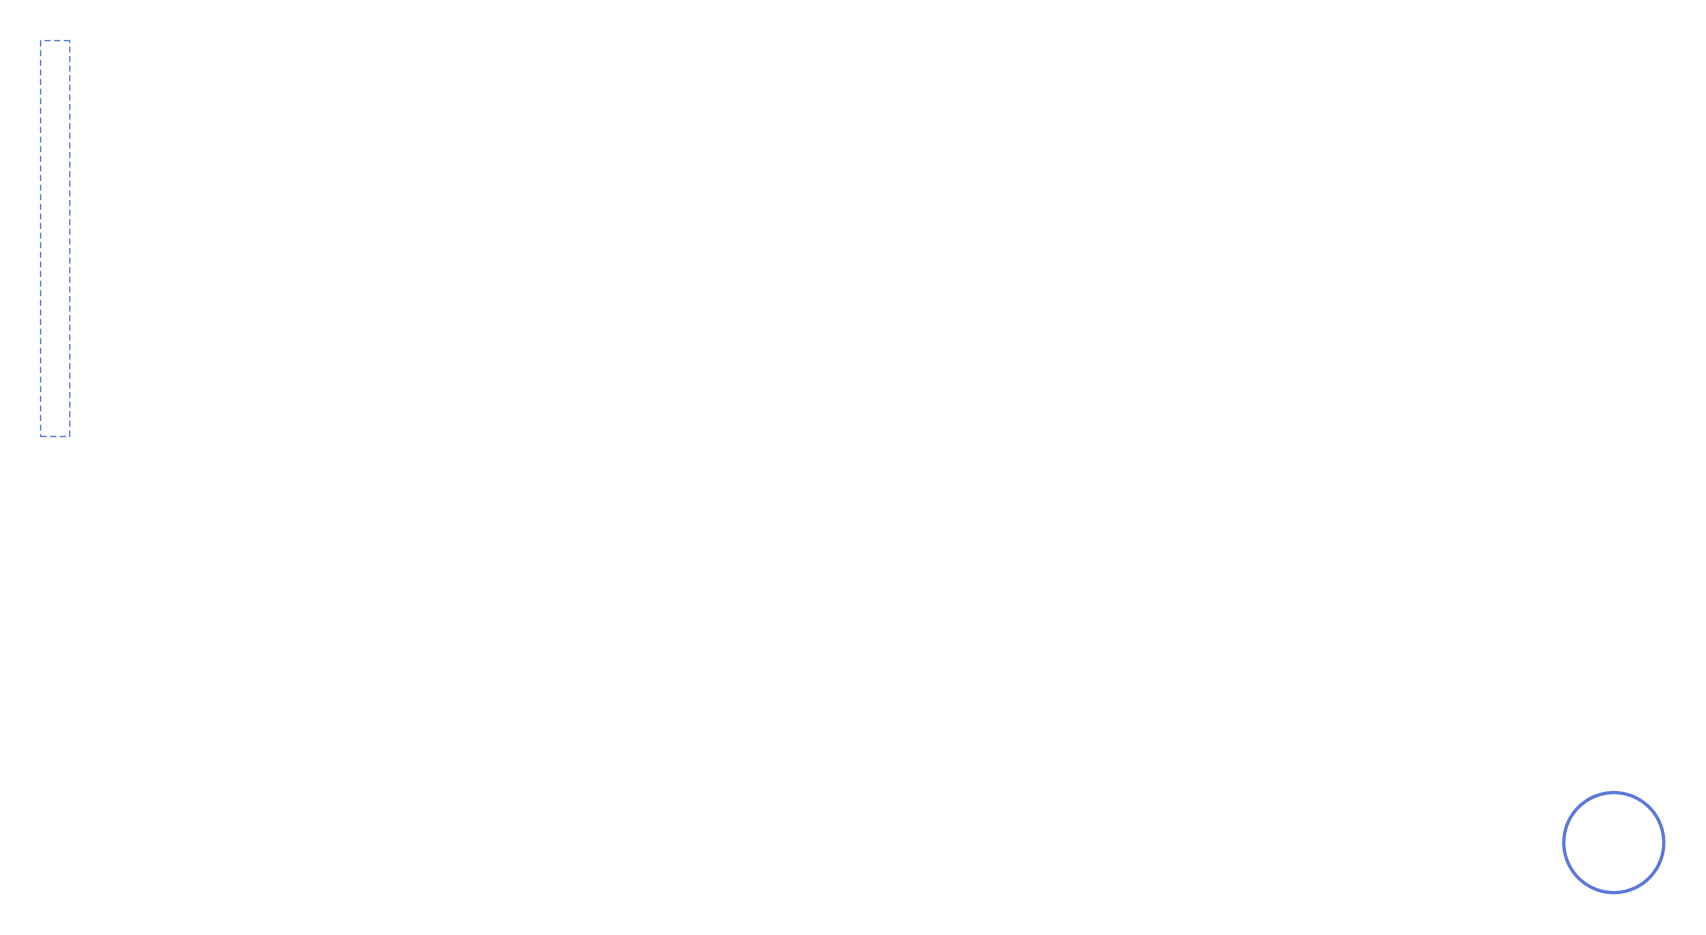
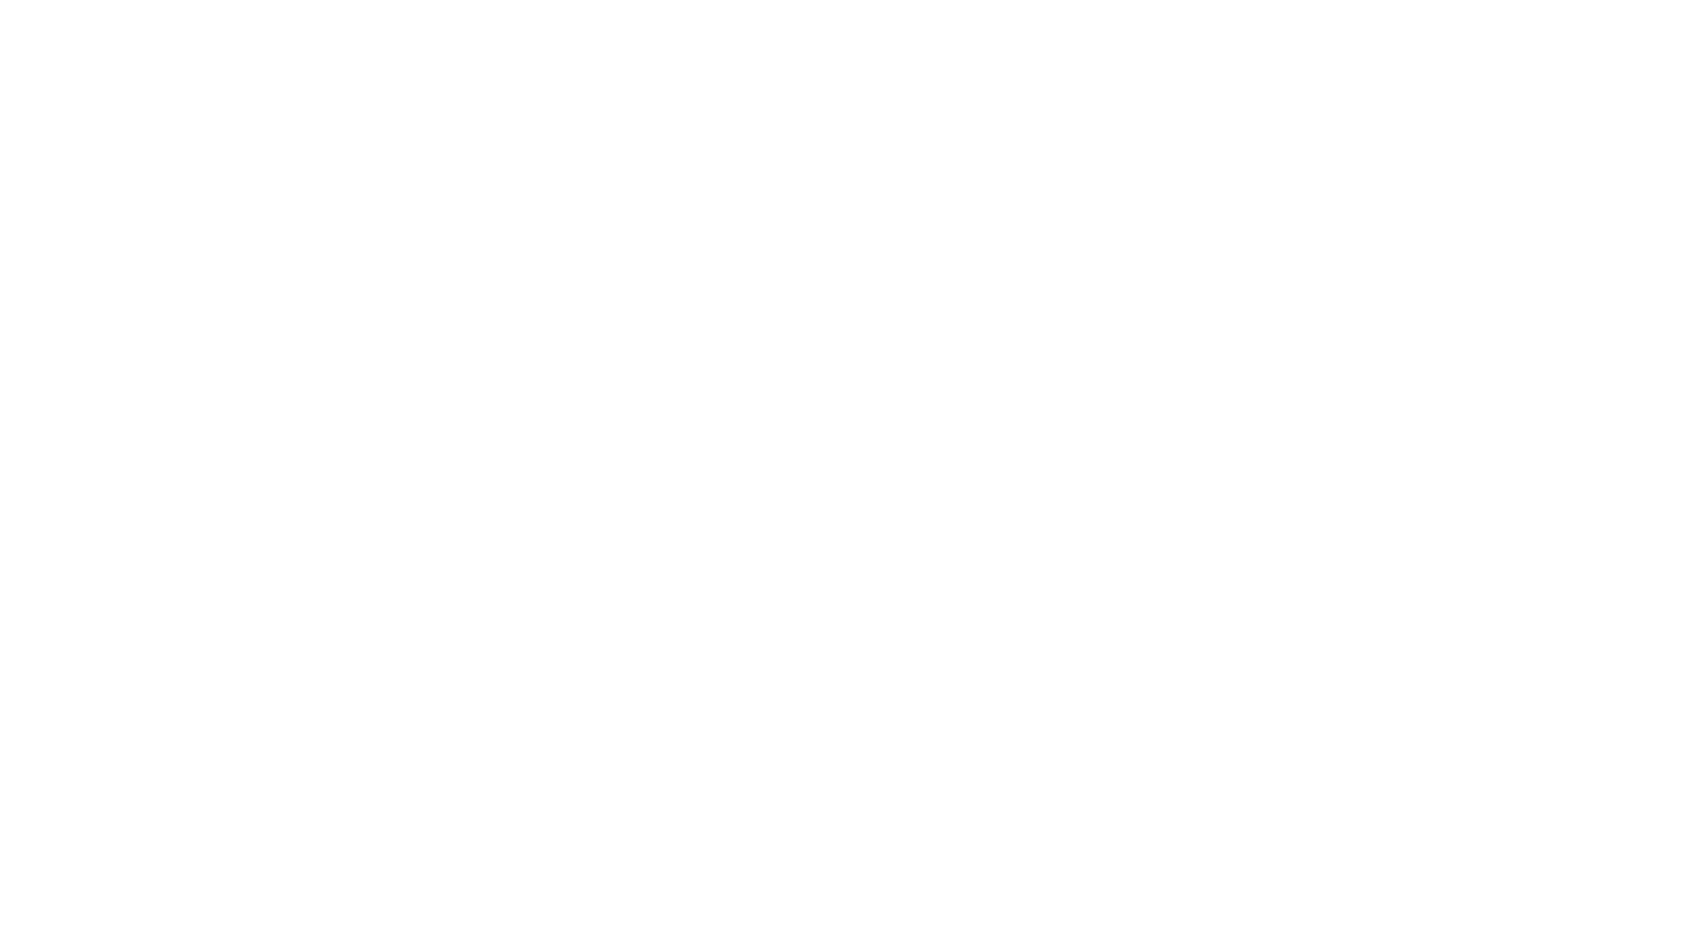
bottom zone outline: (40, 40) (69, 40) (69, 436) (40, 436) (40, 40) -> none
drawing: [1562, 790, 1666, 895] -> none

